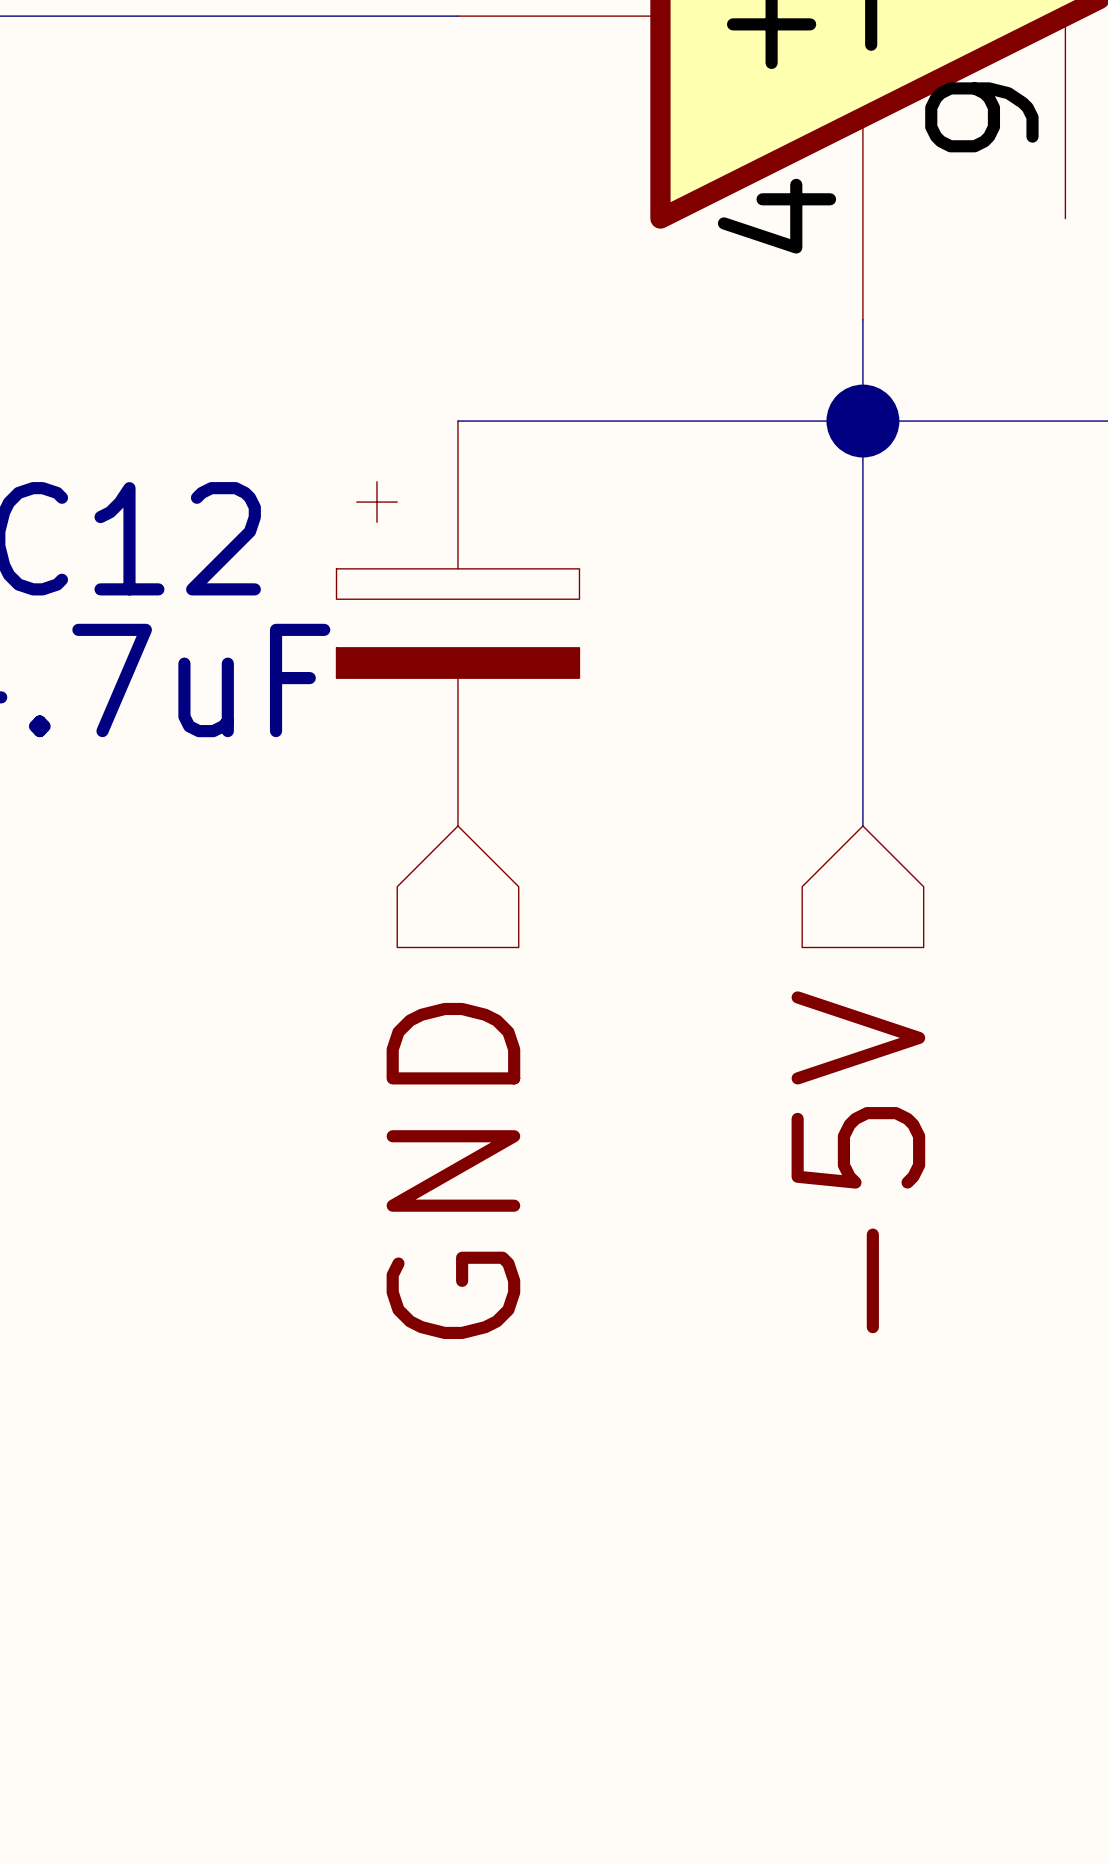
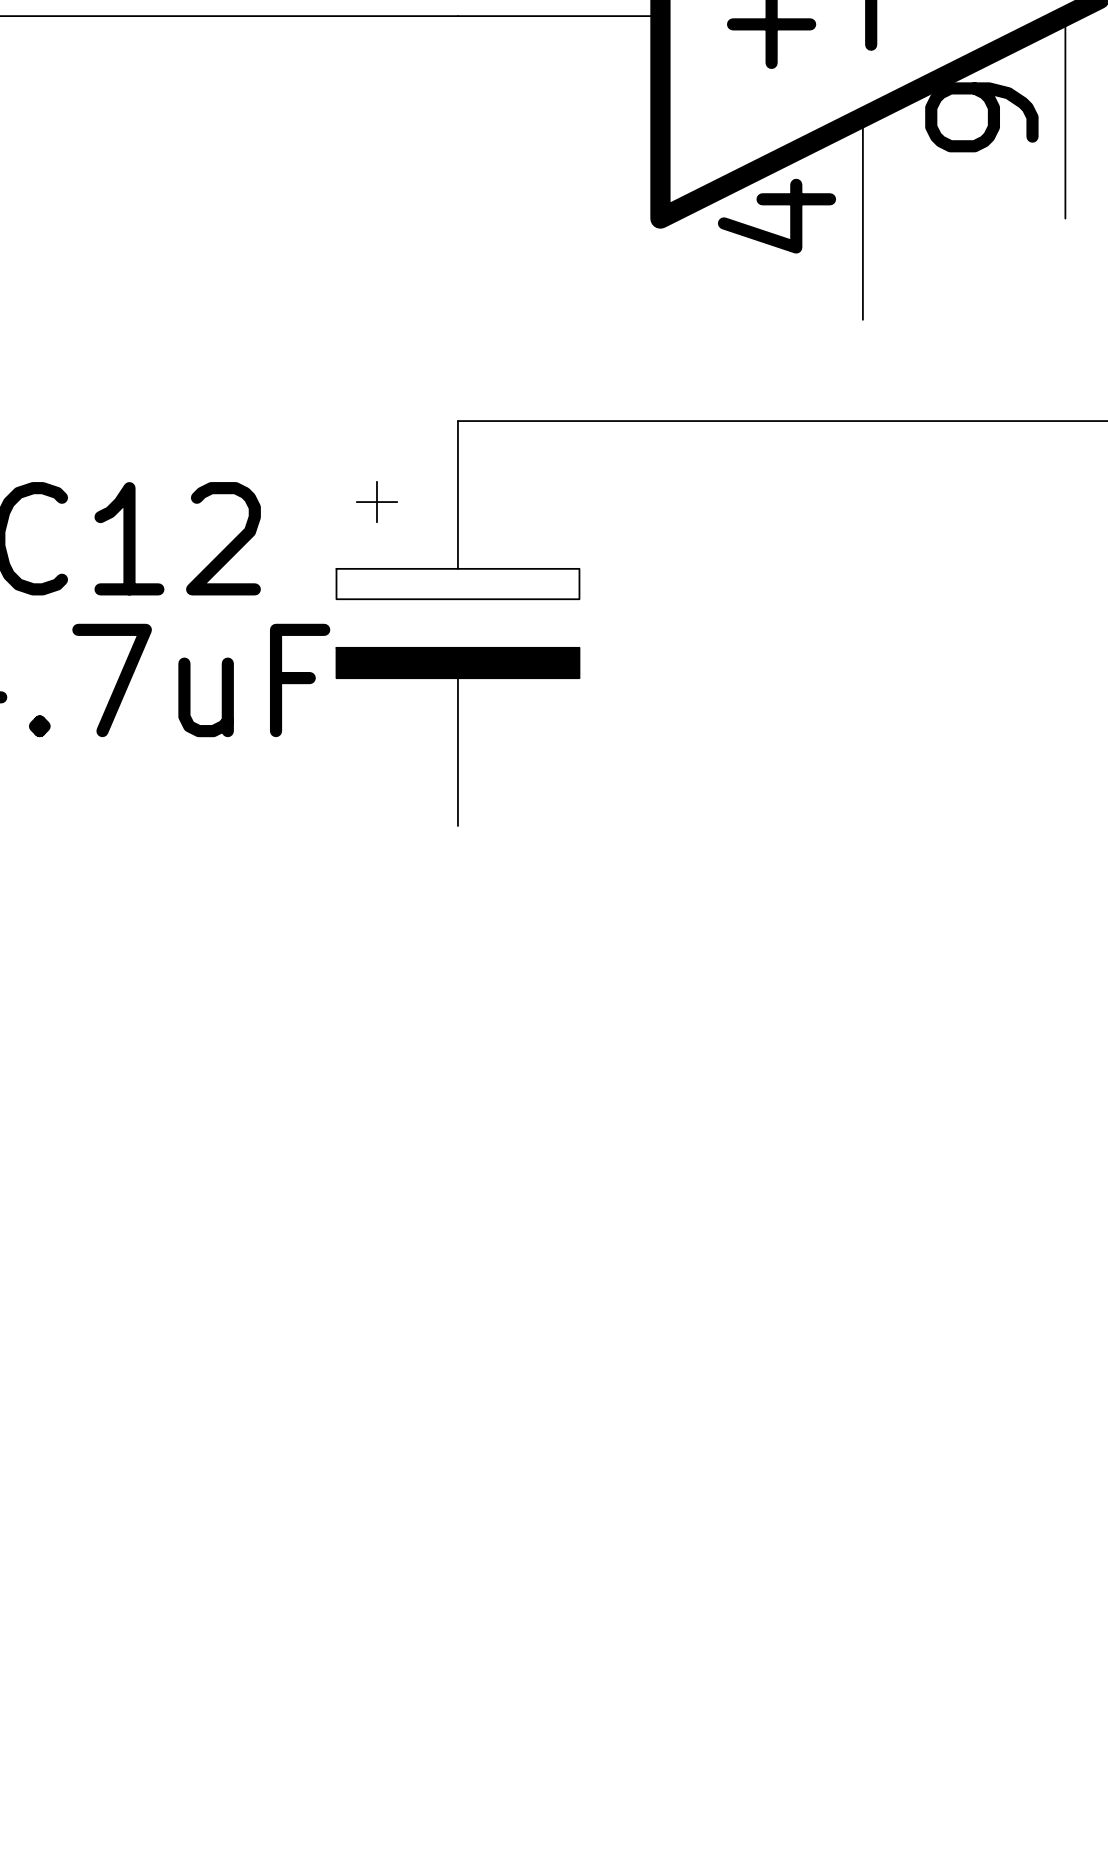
wire: (862, 319) (862, 826) -> none
junction: (862, 421) -> none
hierarchical label: -5V (858, 1162) -> none
hierarchical label: GND (453, 1170) -> none

